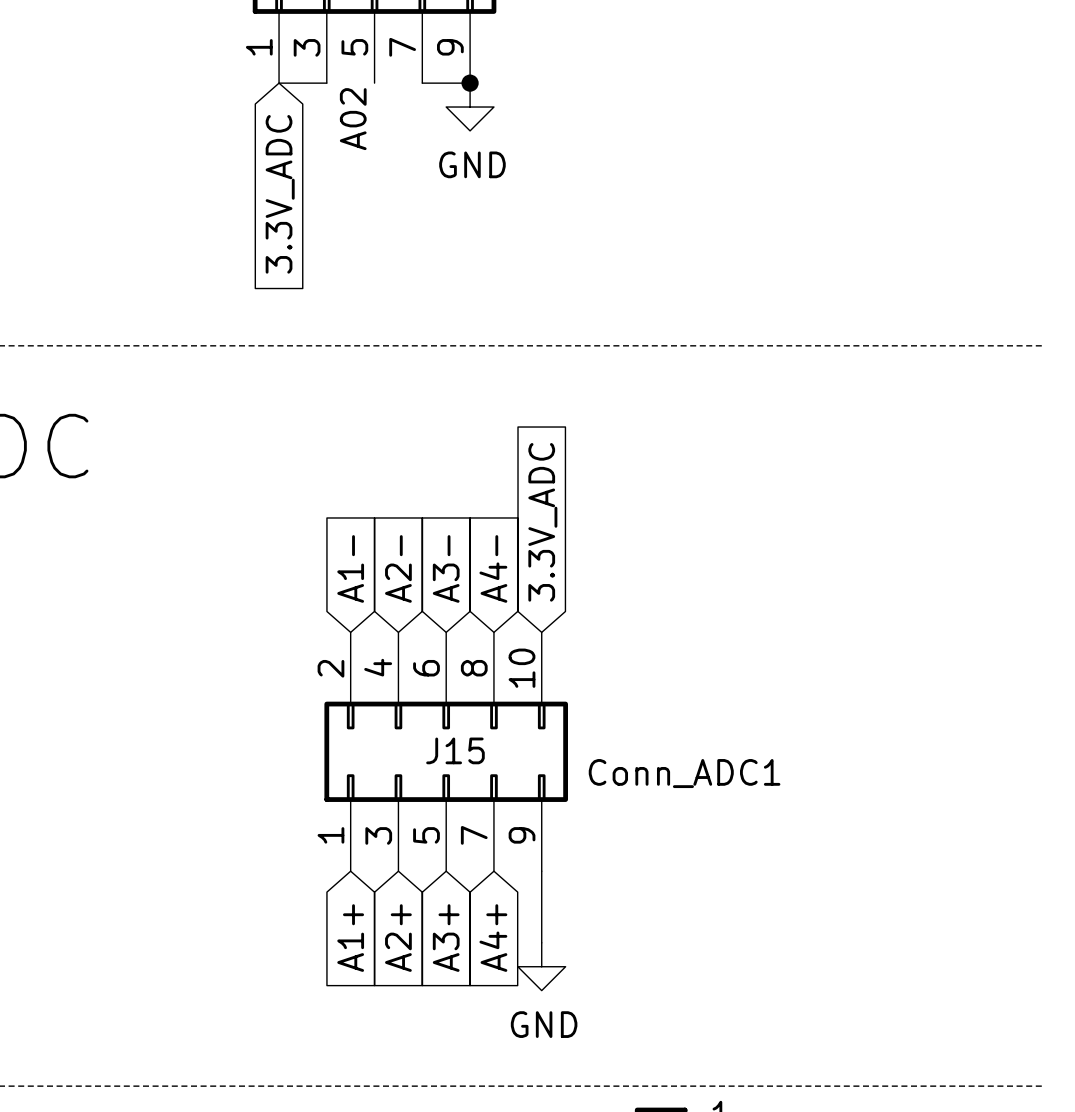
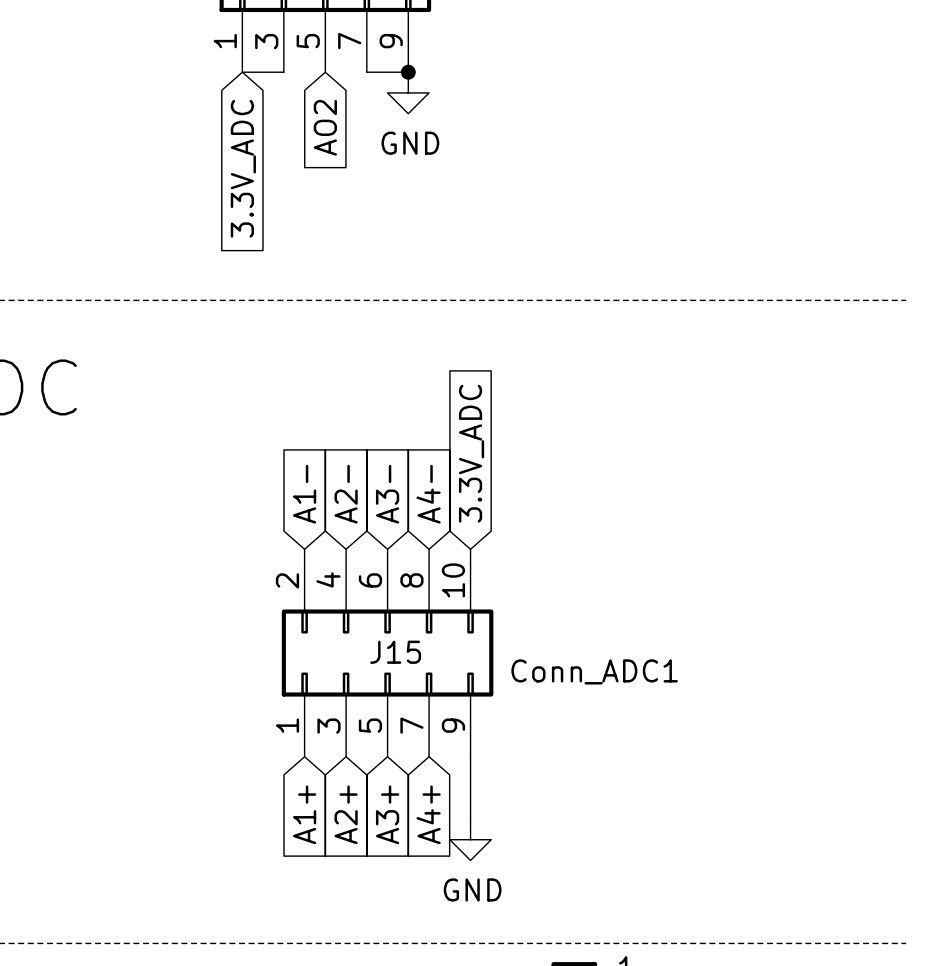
label: A02 (353, 119) -> none
global label: none -> AO2 (325, 127)

